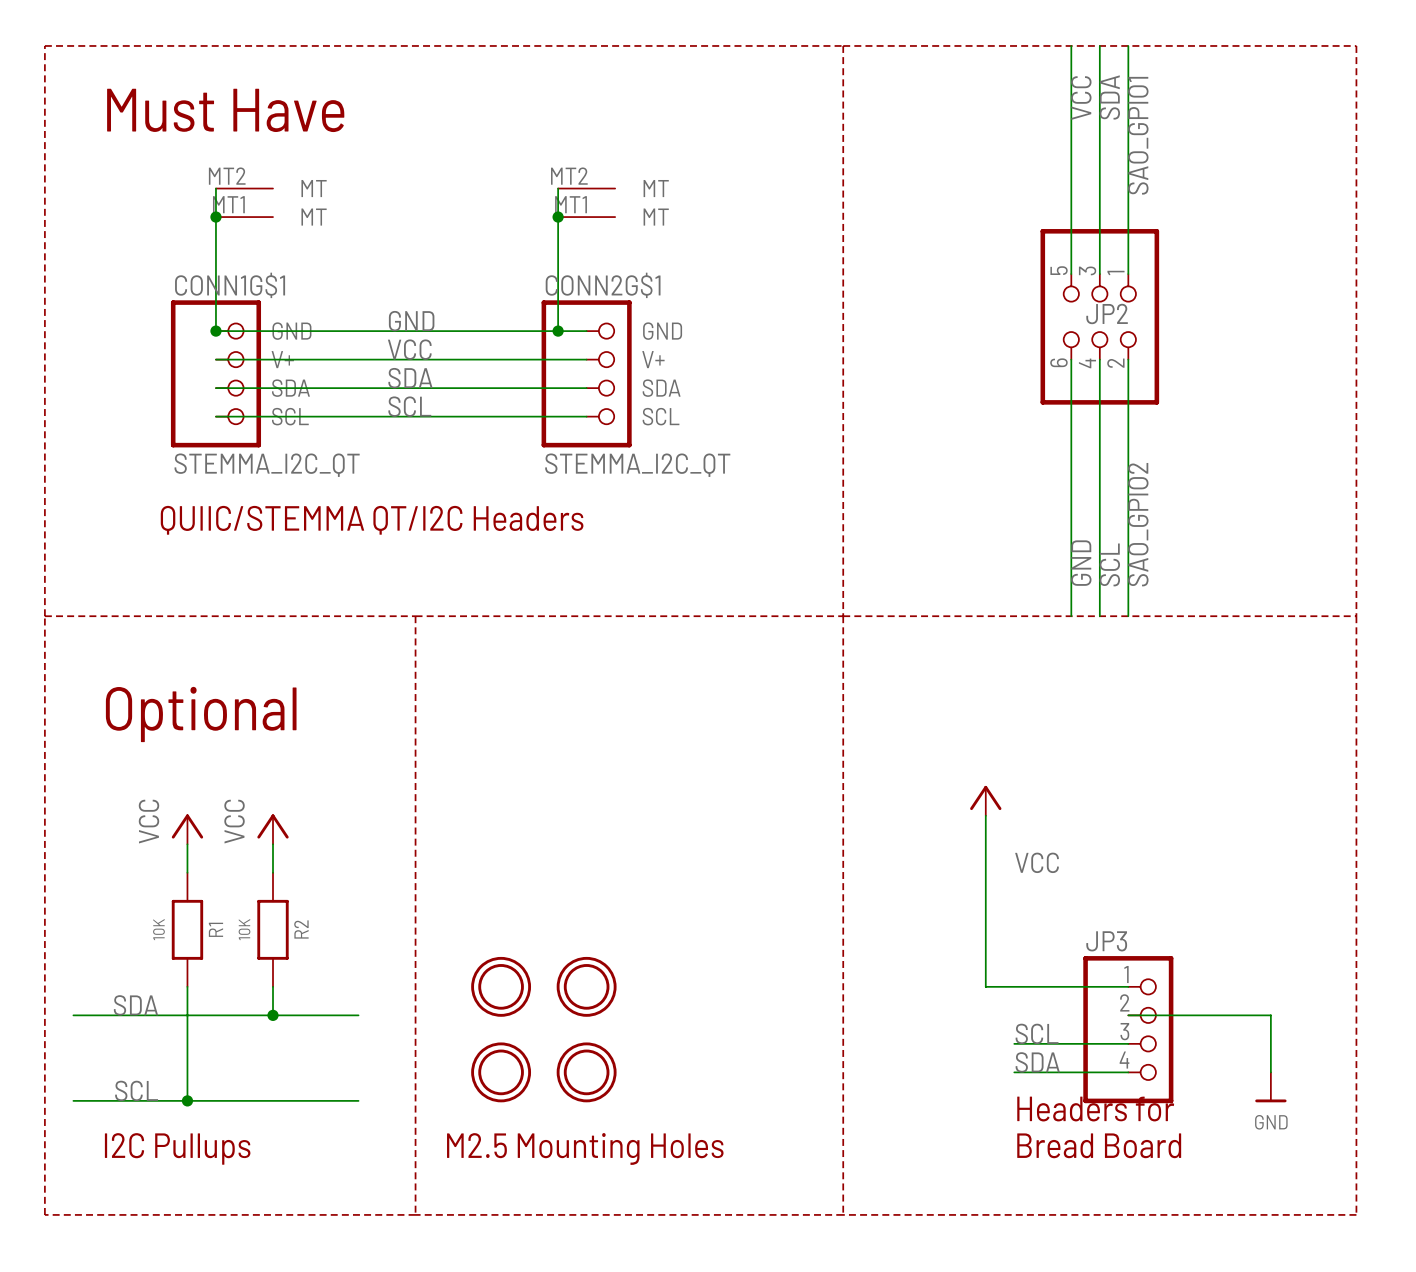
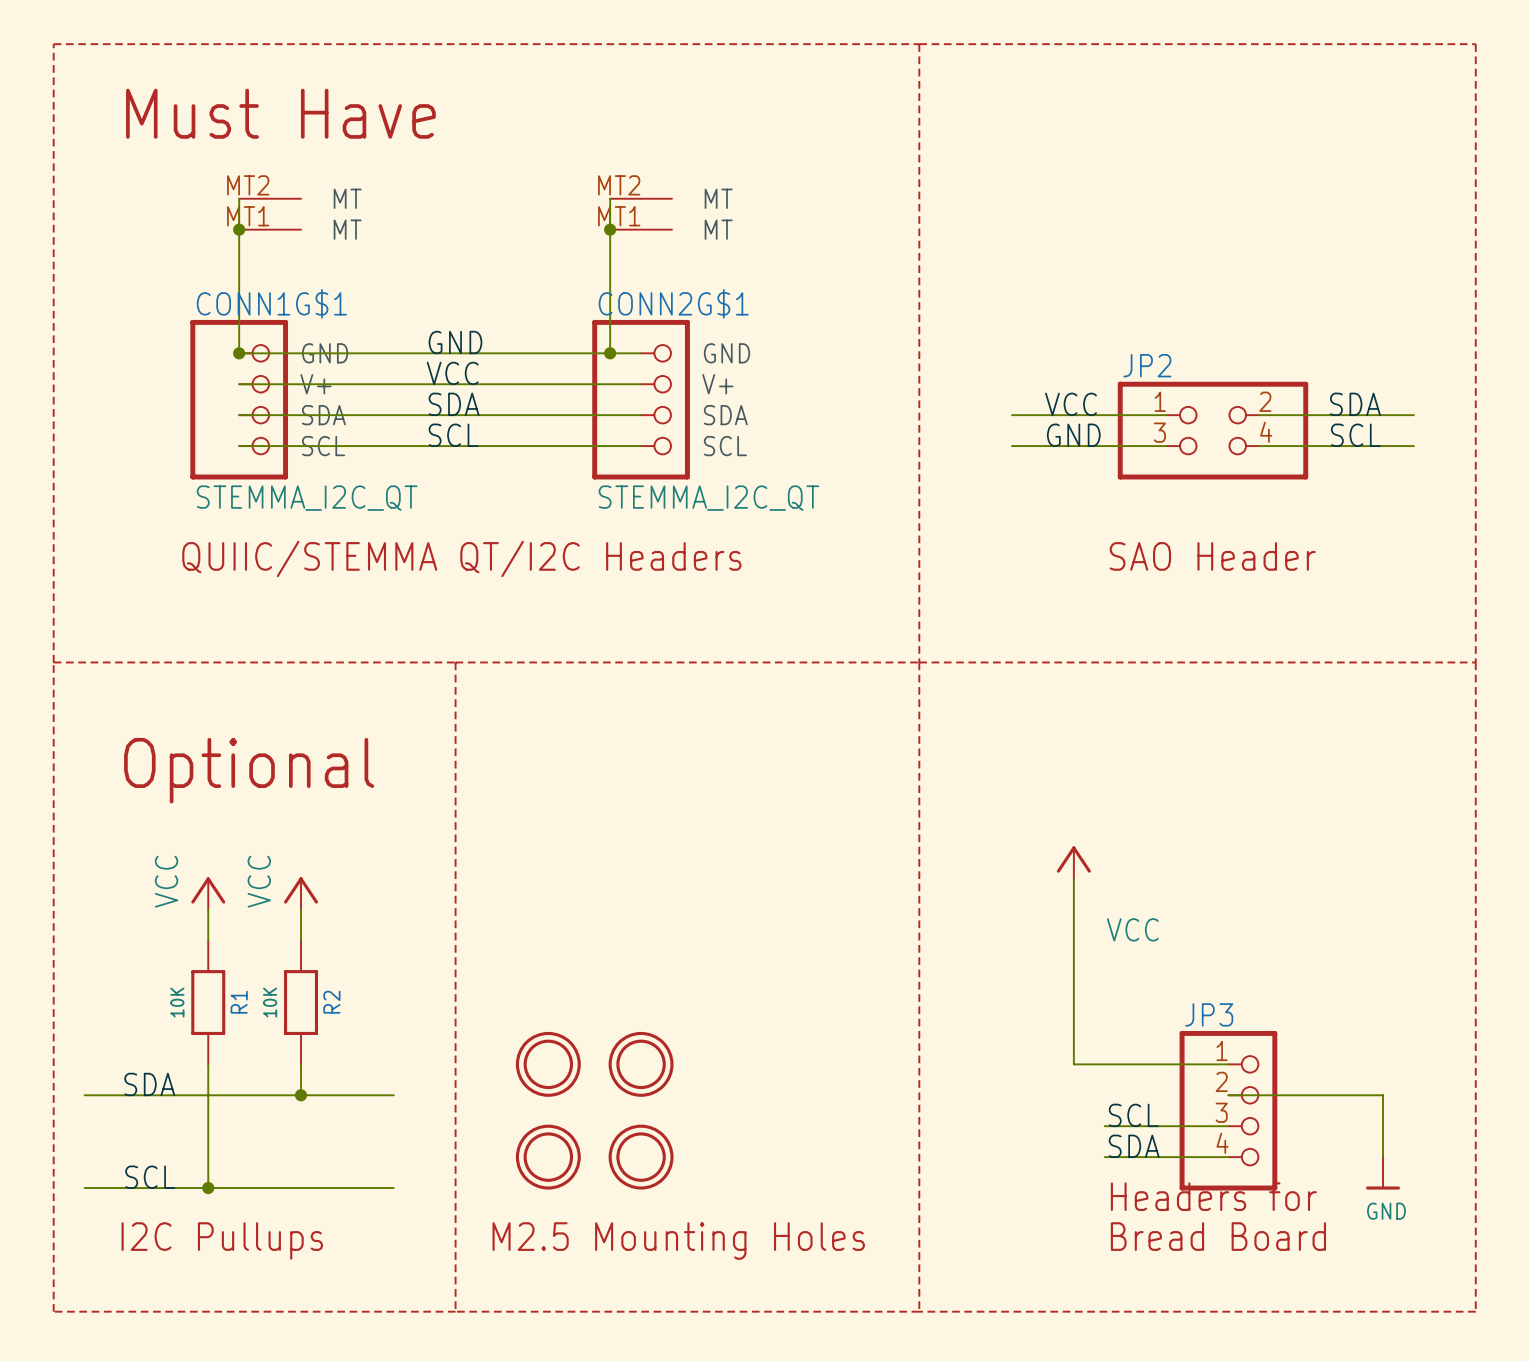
wire: (1071, 45) (1071, 274) -> none
wire: (1099, 45) (1099, 274) -> none
wire: (1128, 45) (1128, 274) -> none
label: SDA (1109, 97) -> none
label: VCC (1081, 98) -> none
label: SAO_GPIO1 (1138, 135) -> none
JP2 symbol: [1040, 229, 1160, 405] -> [1117, 381, 1309, 480]
JP2 name position: JP2 (1107, 313) -> JP2 (1147, 365)
wire: (1071, 359) (1071, 616) -> none
wire: (1099, 359) (1099, 616) -> none
wire: (1128, 359) (1128, 616) -> none
label: none -> VCC (1071, 404)
label: none -> SDA (1355, 404)
wire: none -> (1012, 415) (1166, 415)
wire: none -> (1259, 415) (1413, 415)
wire: none -> (1012, 446) (1166, 446)
wire: none -> (1259, 446) (1413, 446)
text: none -> SAO Header (1212, 556)
label: SAO_GPIO2 (1138, 524) -> none
label rotation: 0° (1081, 563) -> 90° clockwise (1073, 435)
label position: GND (1081, 563) -> GND (1073, 435)
label rotation: 0° (1109, 564) -> 90° clockwise (1355, 435)
label position: SCL (1109, 564) -> SCL (1355, 435)

